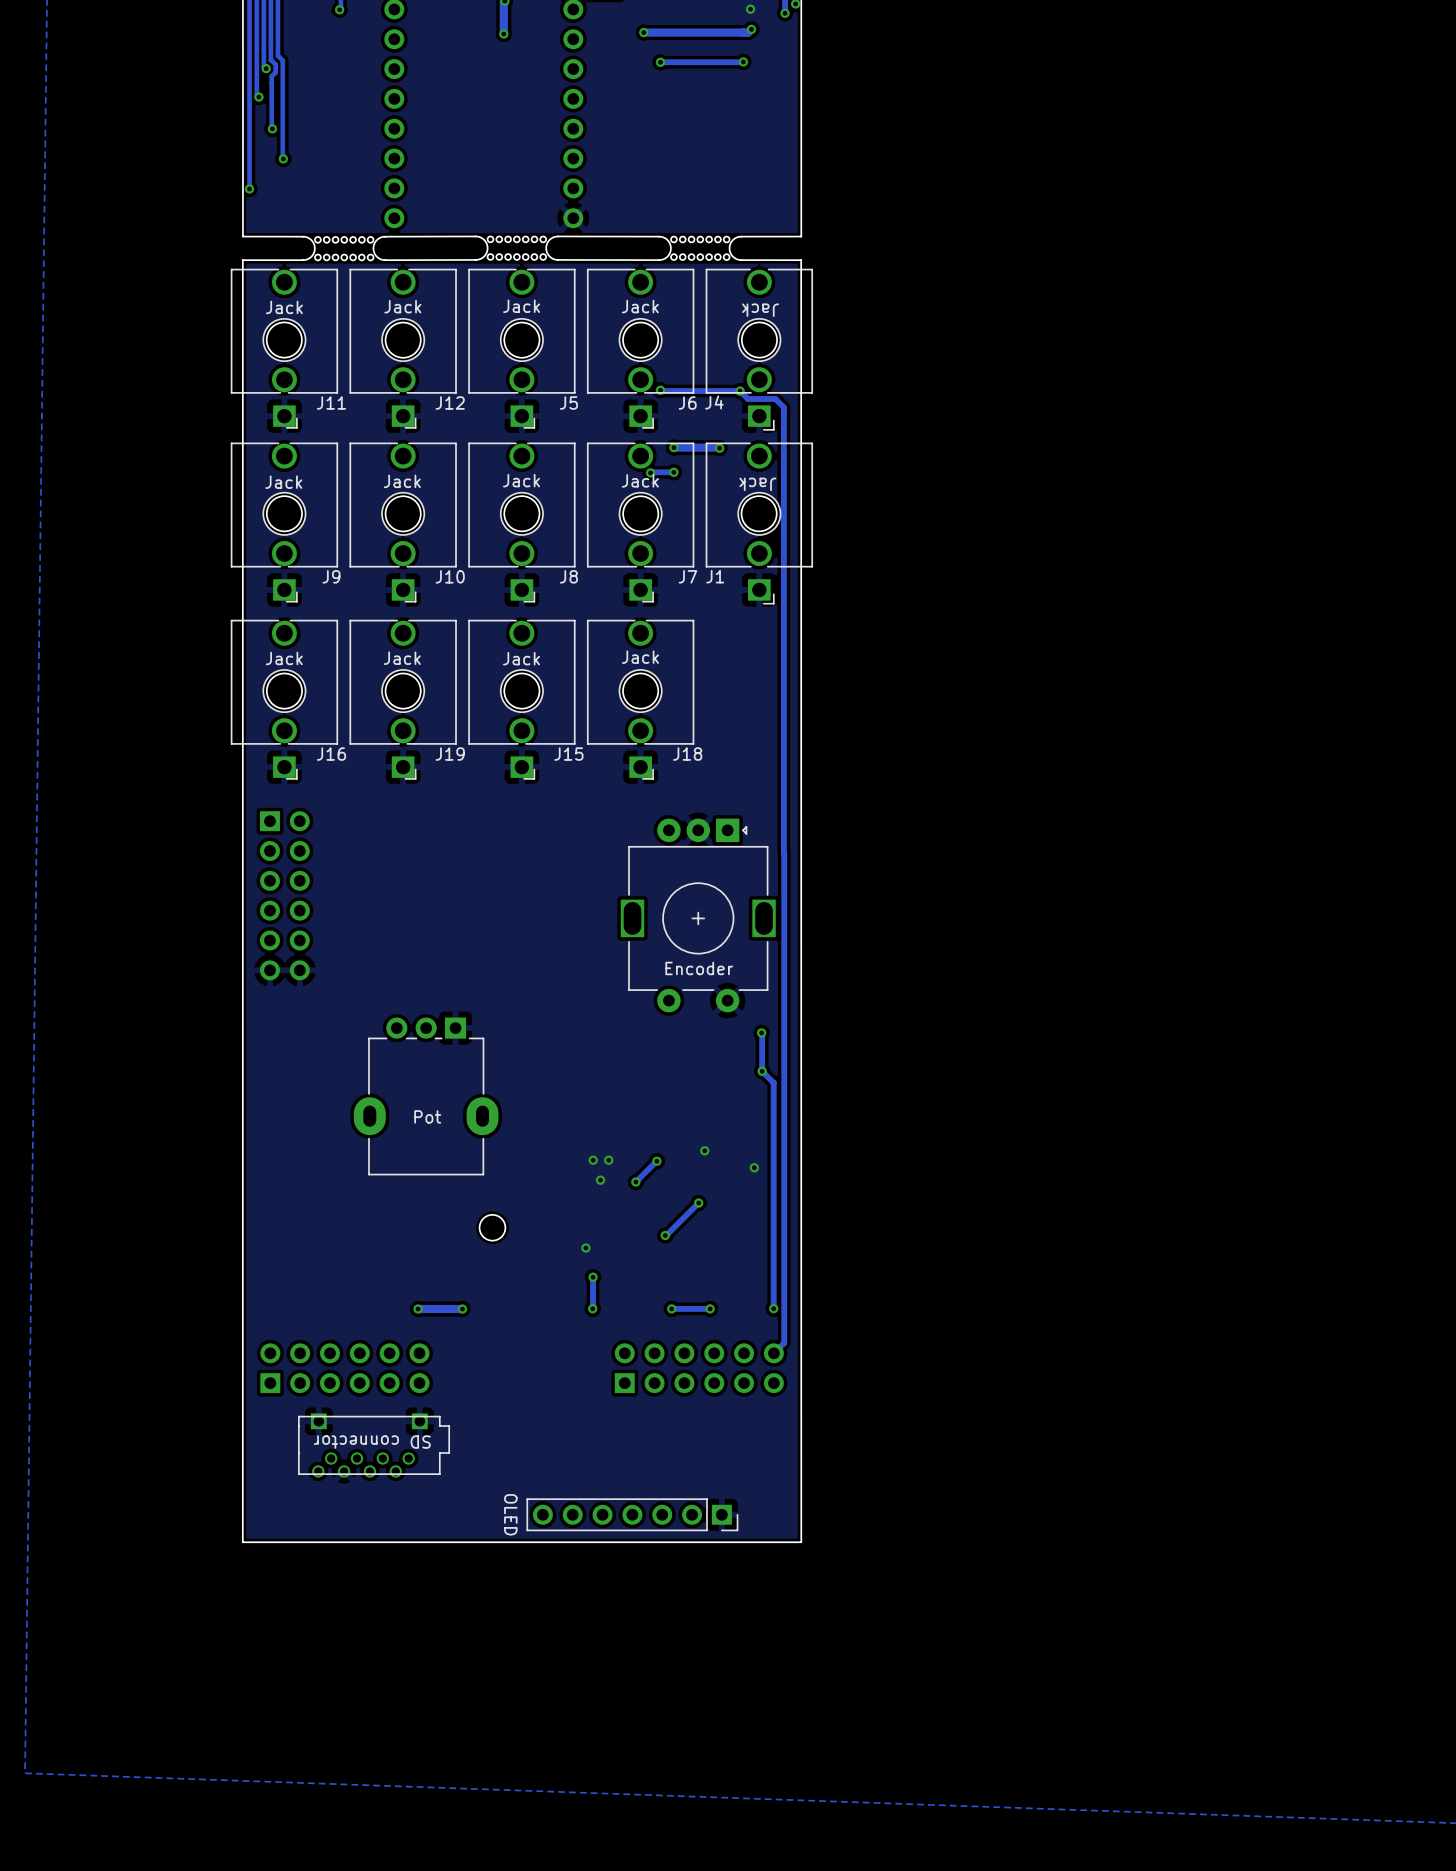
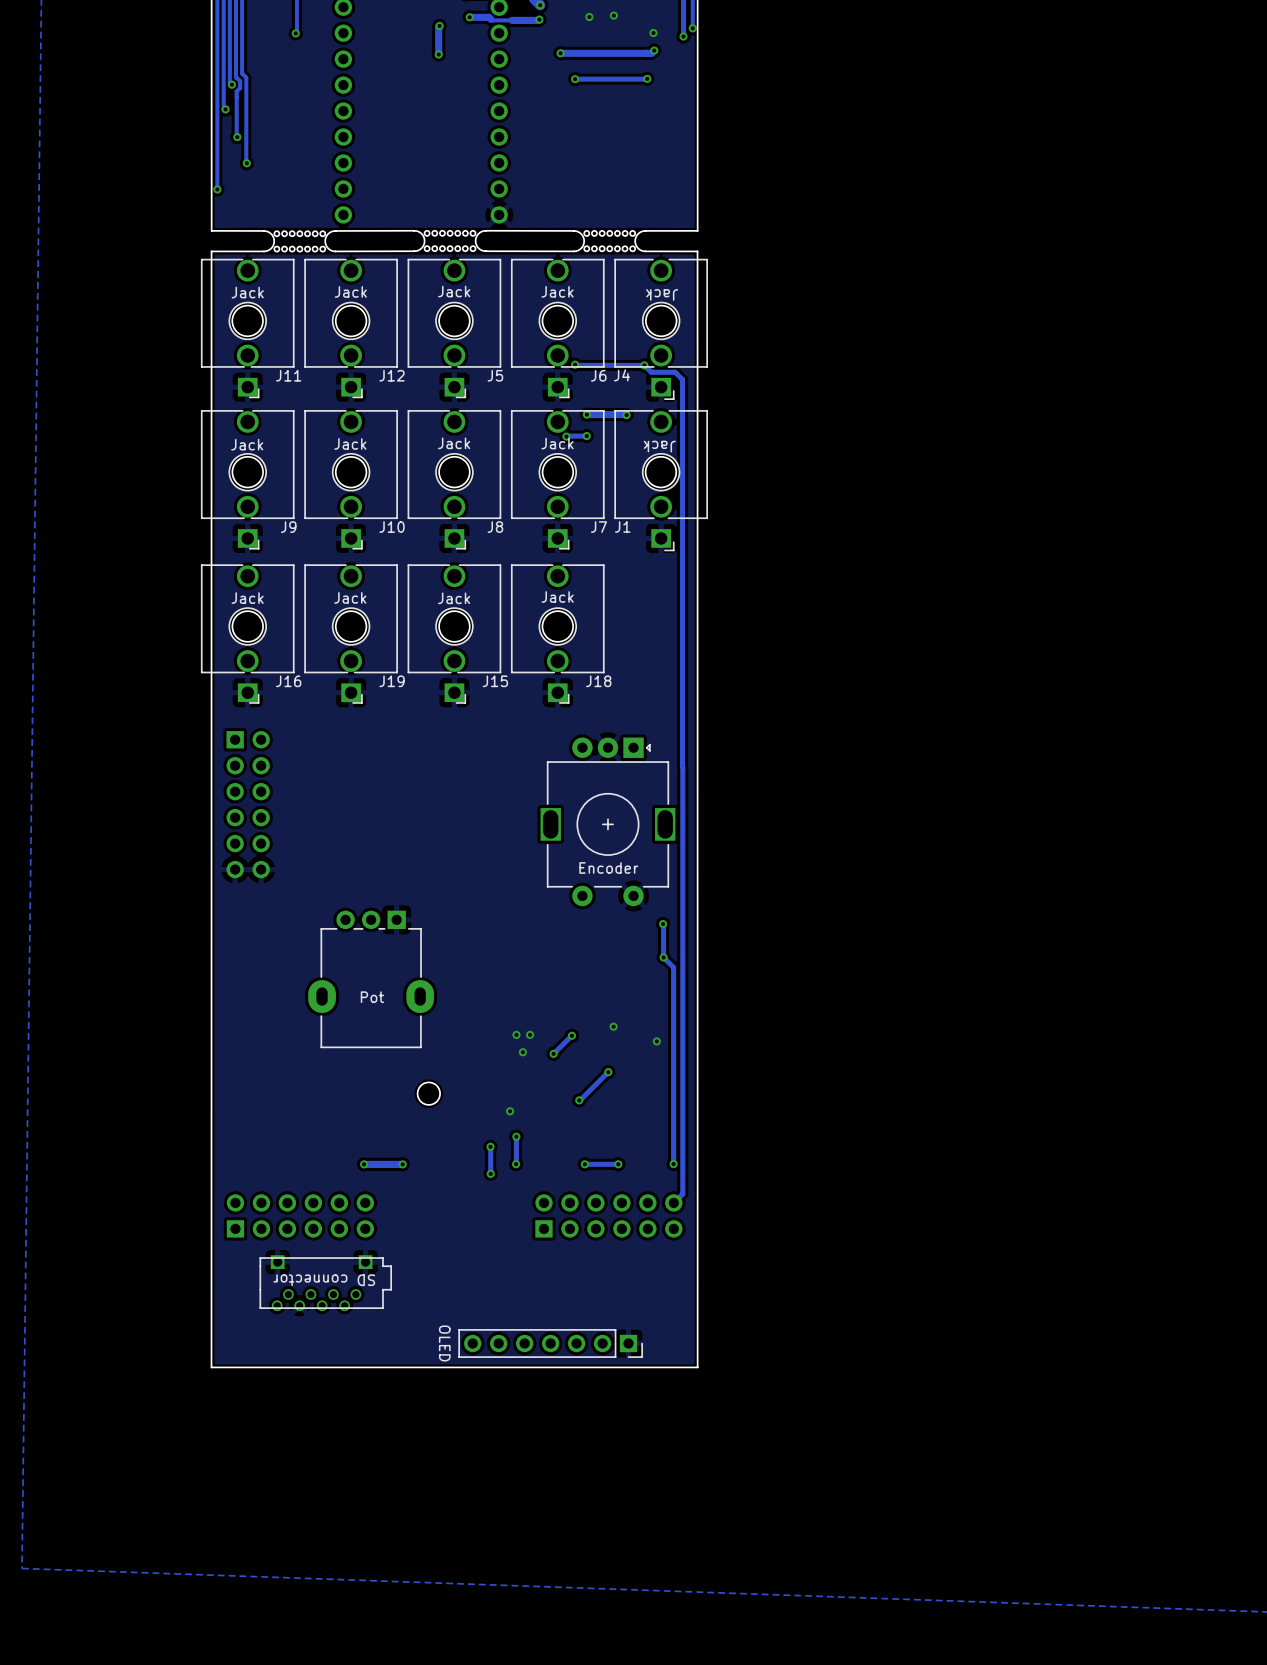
track: none -> (490, 1146) (490, 1173)
via: none -> (490, 1146)
via: none -> (490, 1173)

